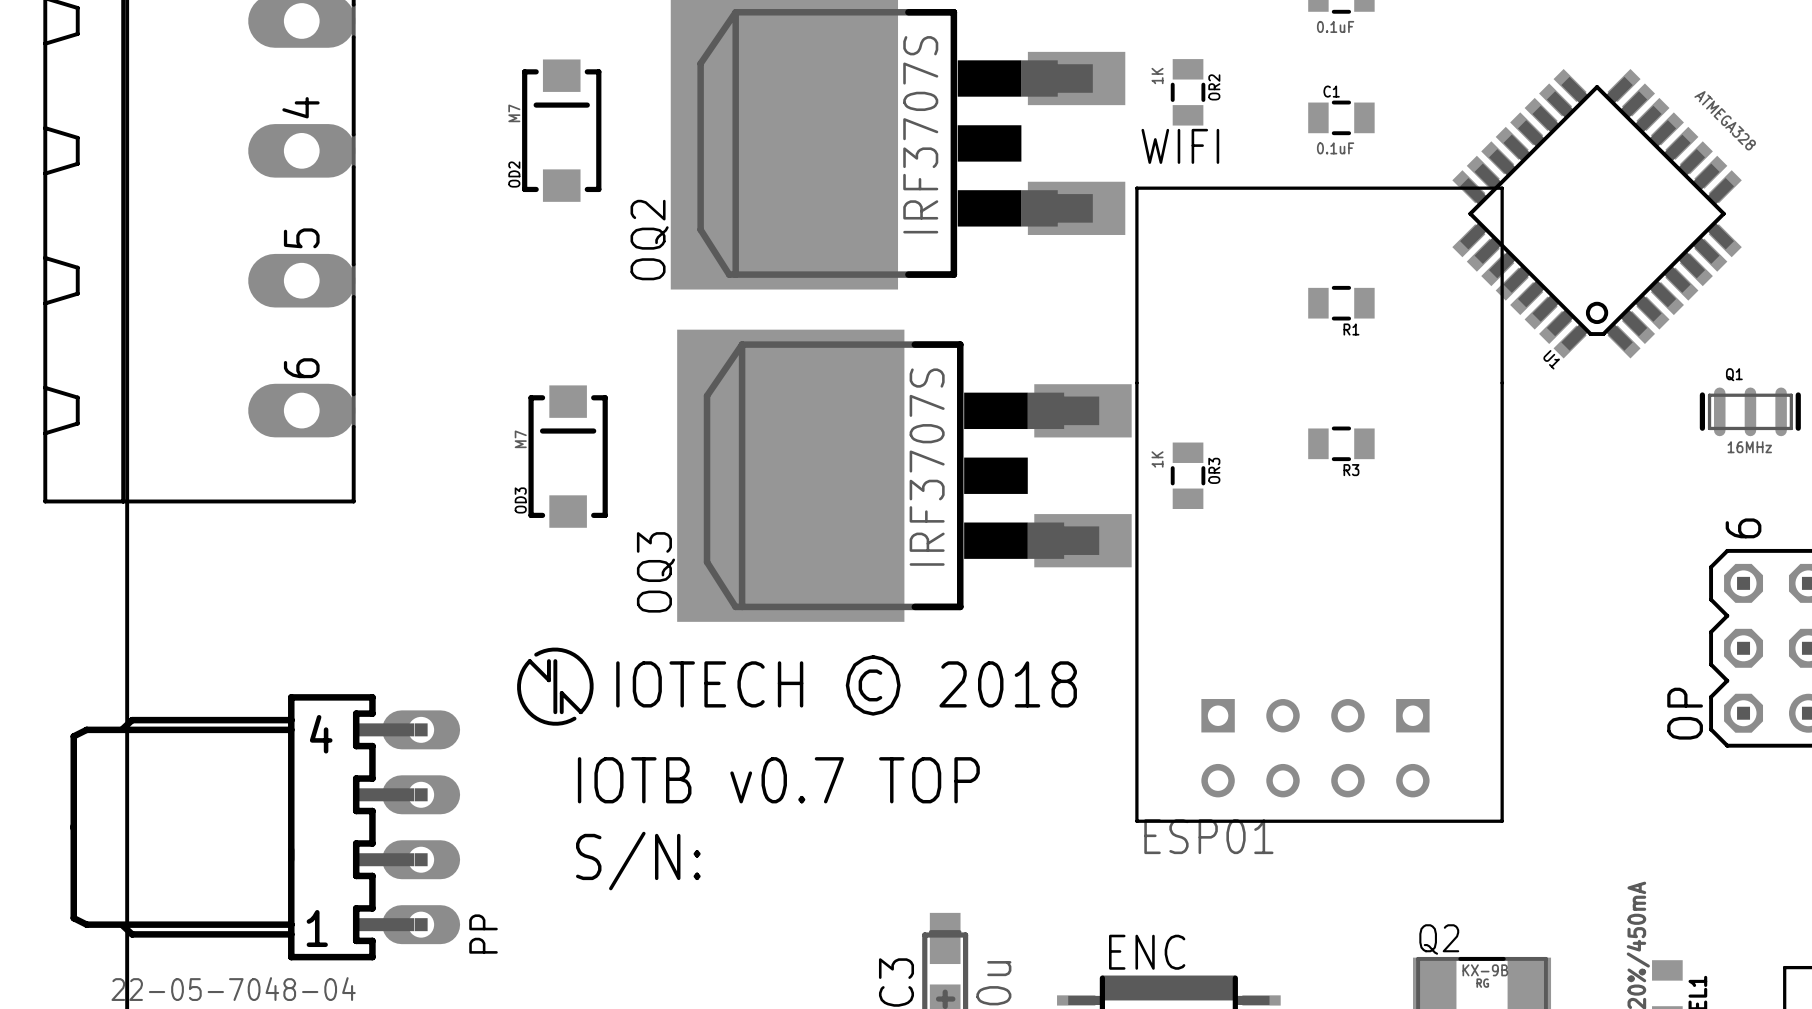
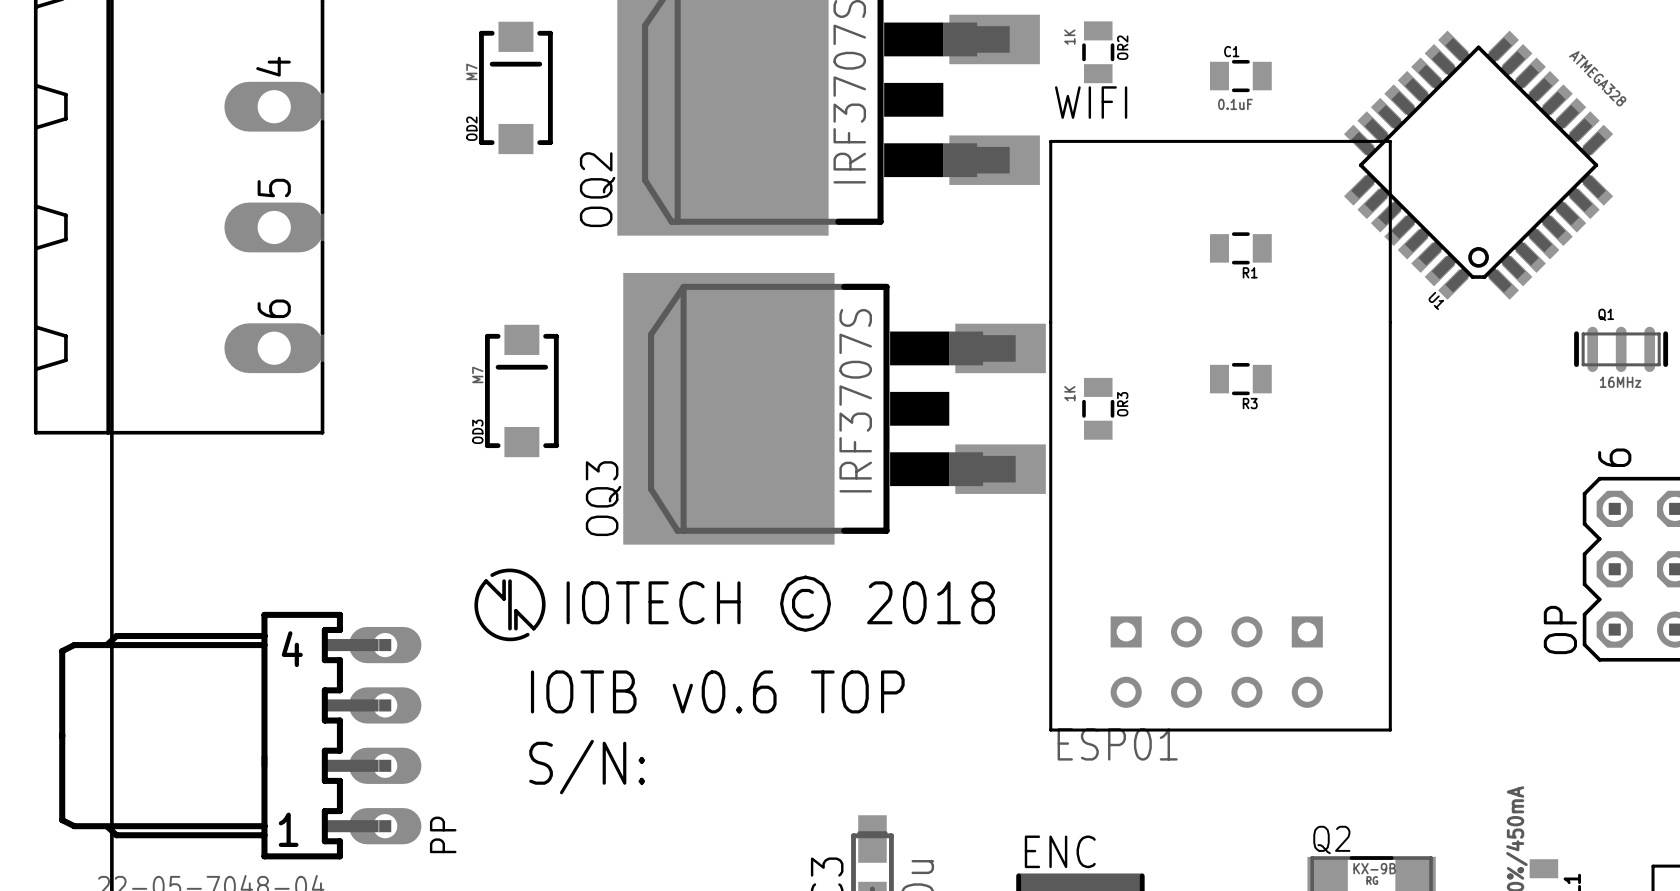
text: IOTB v0.7 TOP (778, 780) -> IOTB v0.6 TOP (717, 691)

